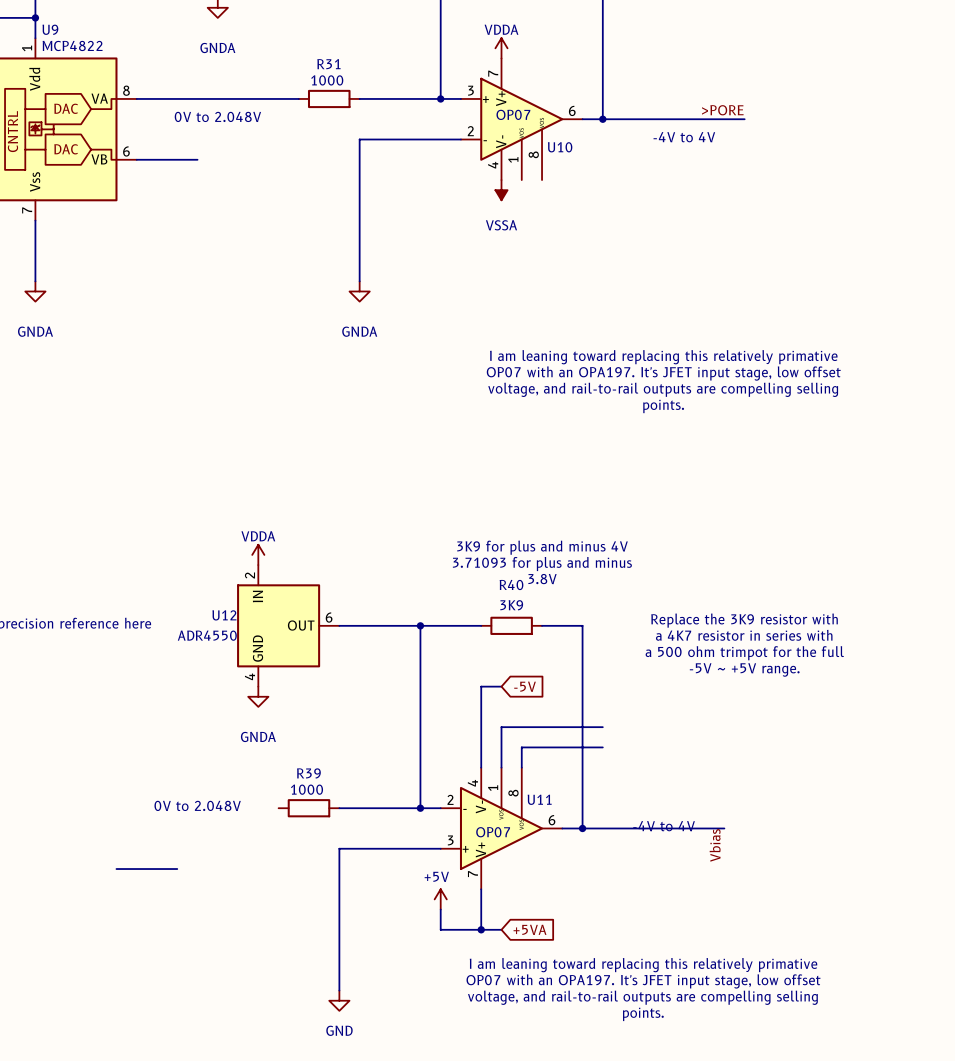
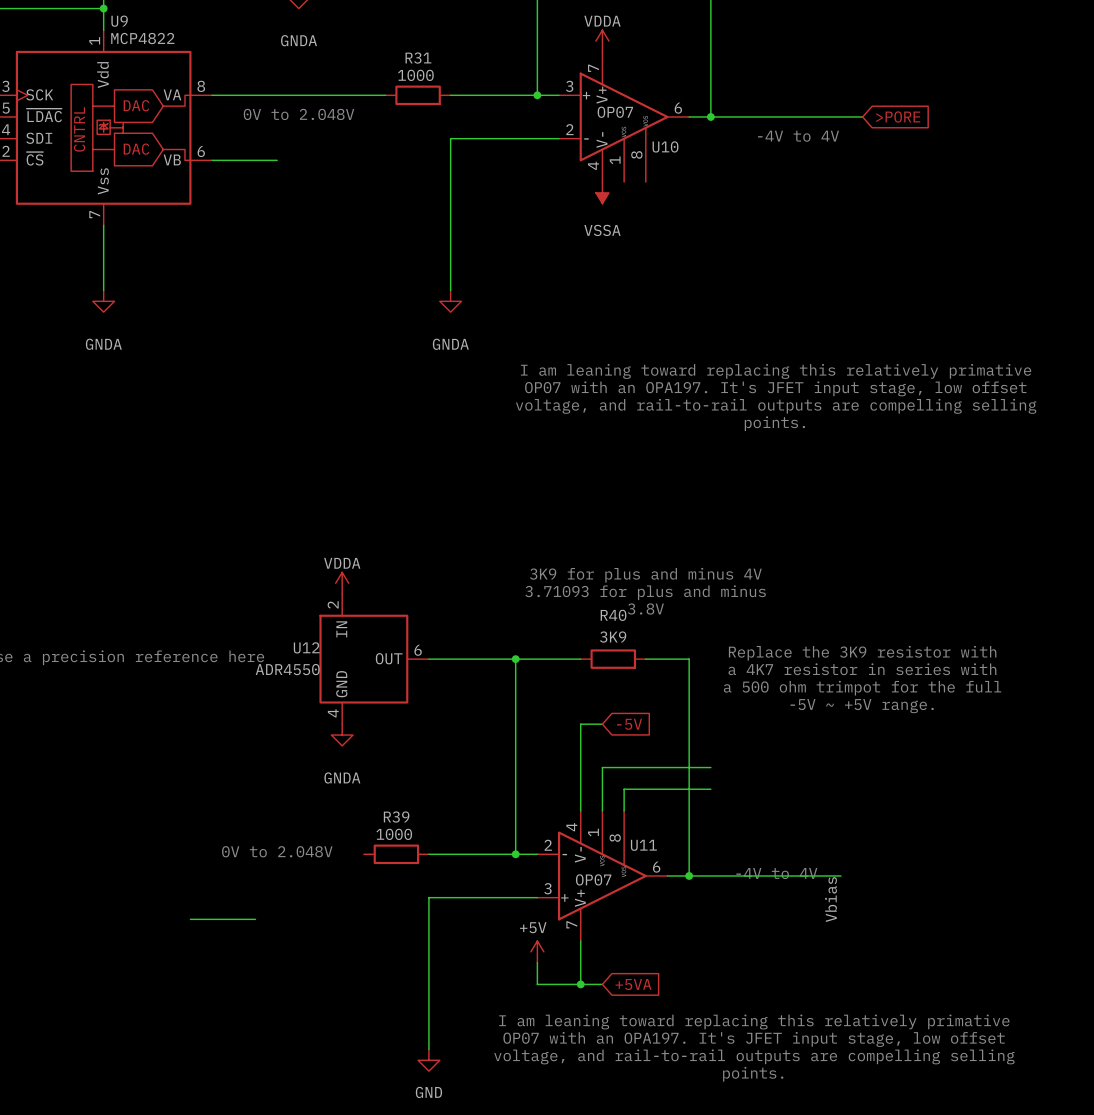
label: >PORE (722, 110) -> none
global label: none -> >PORE (898, 116)

